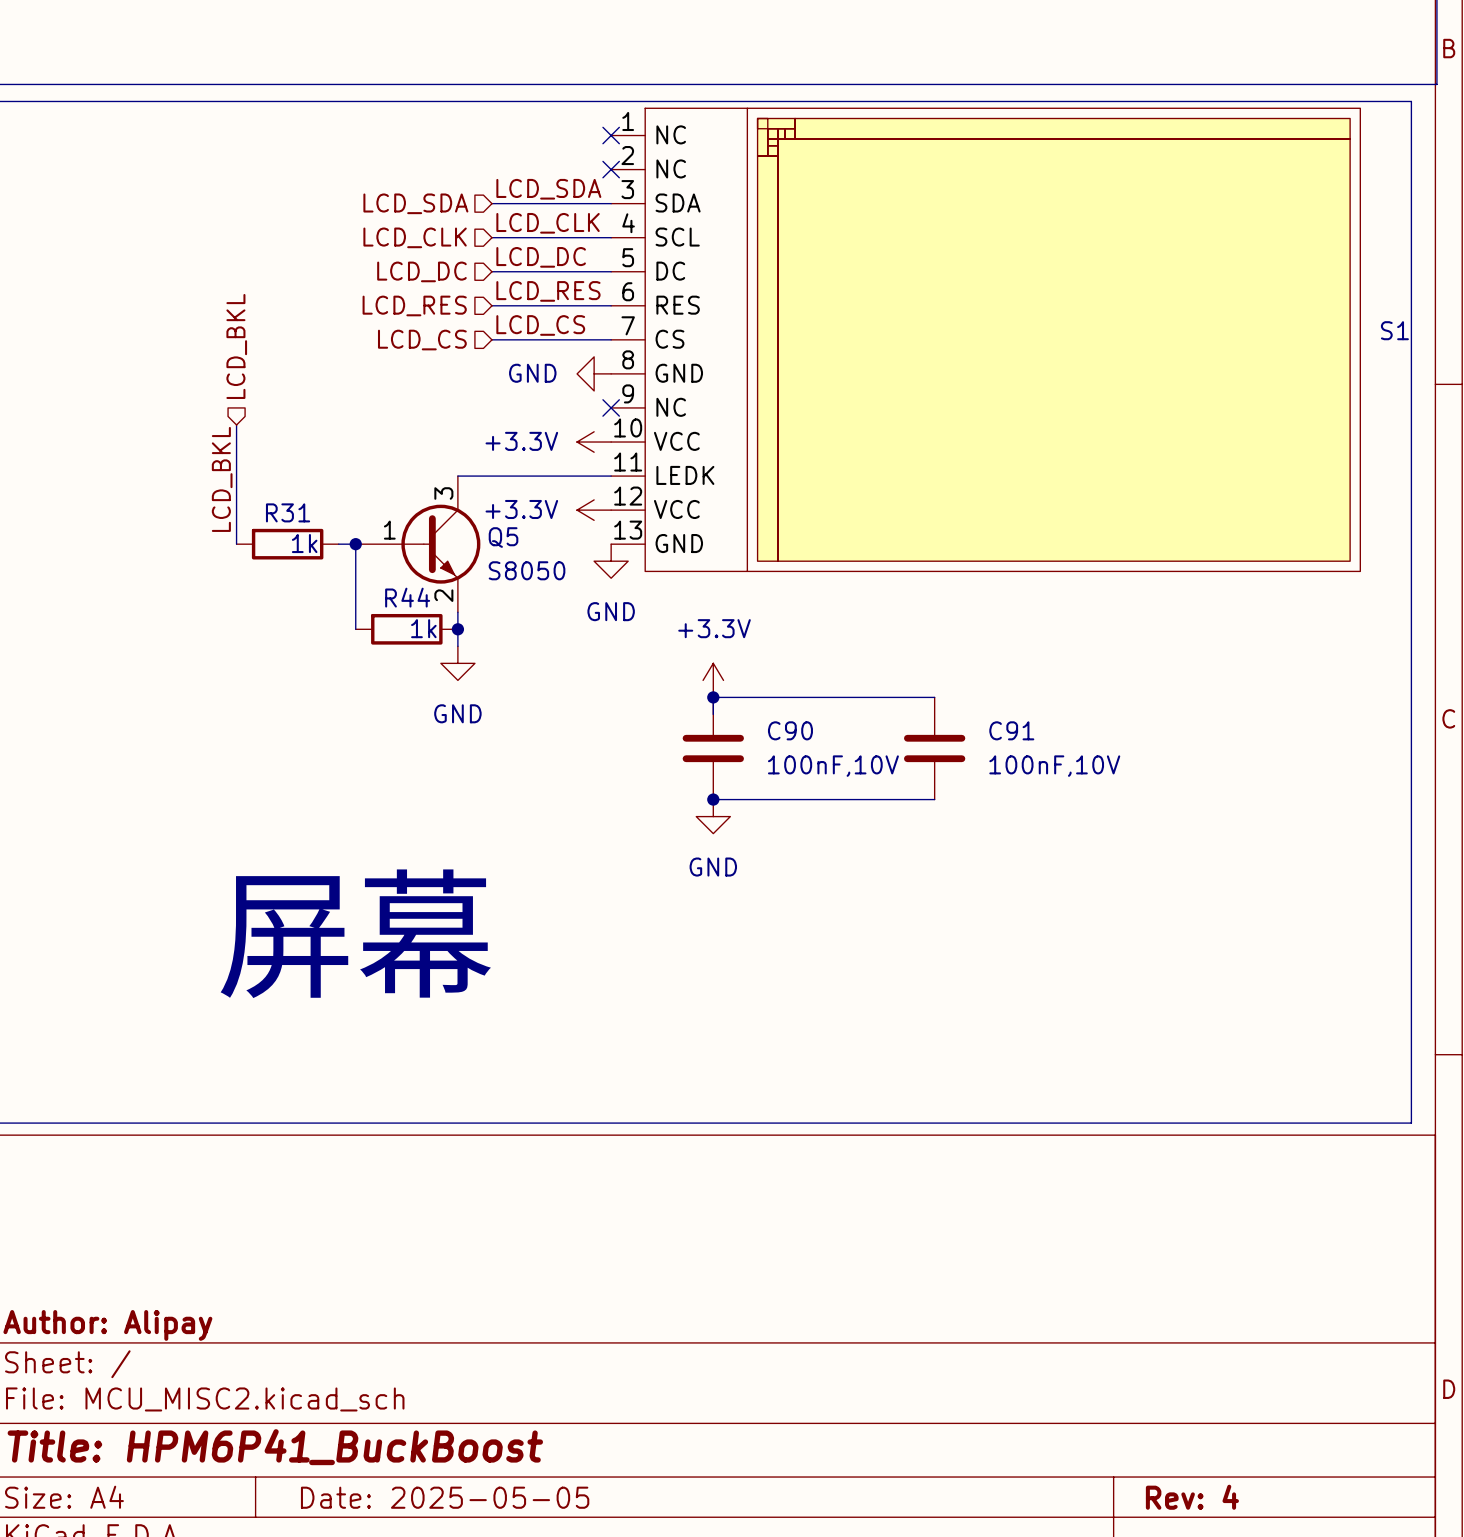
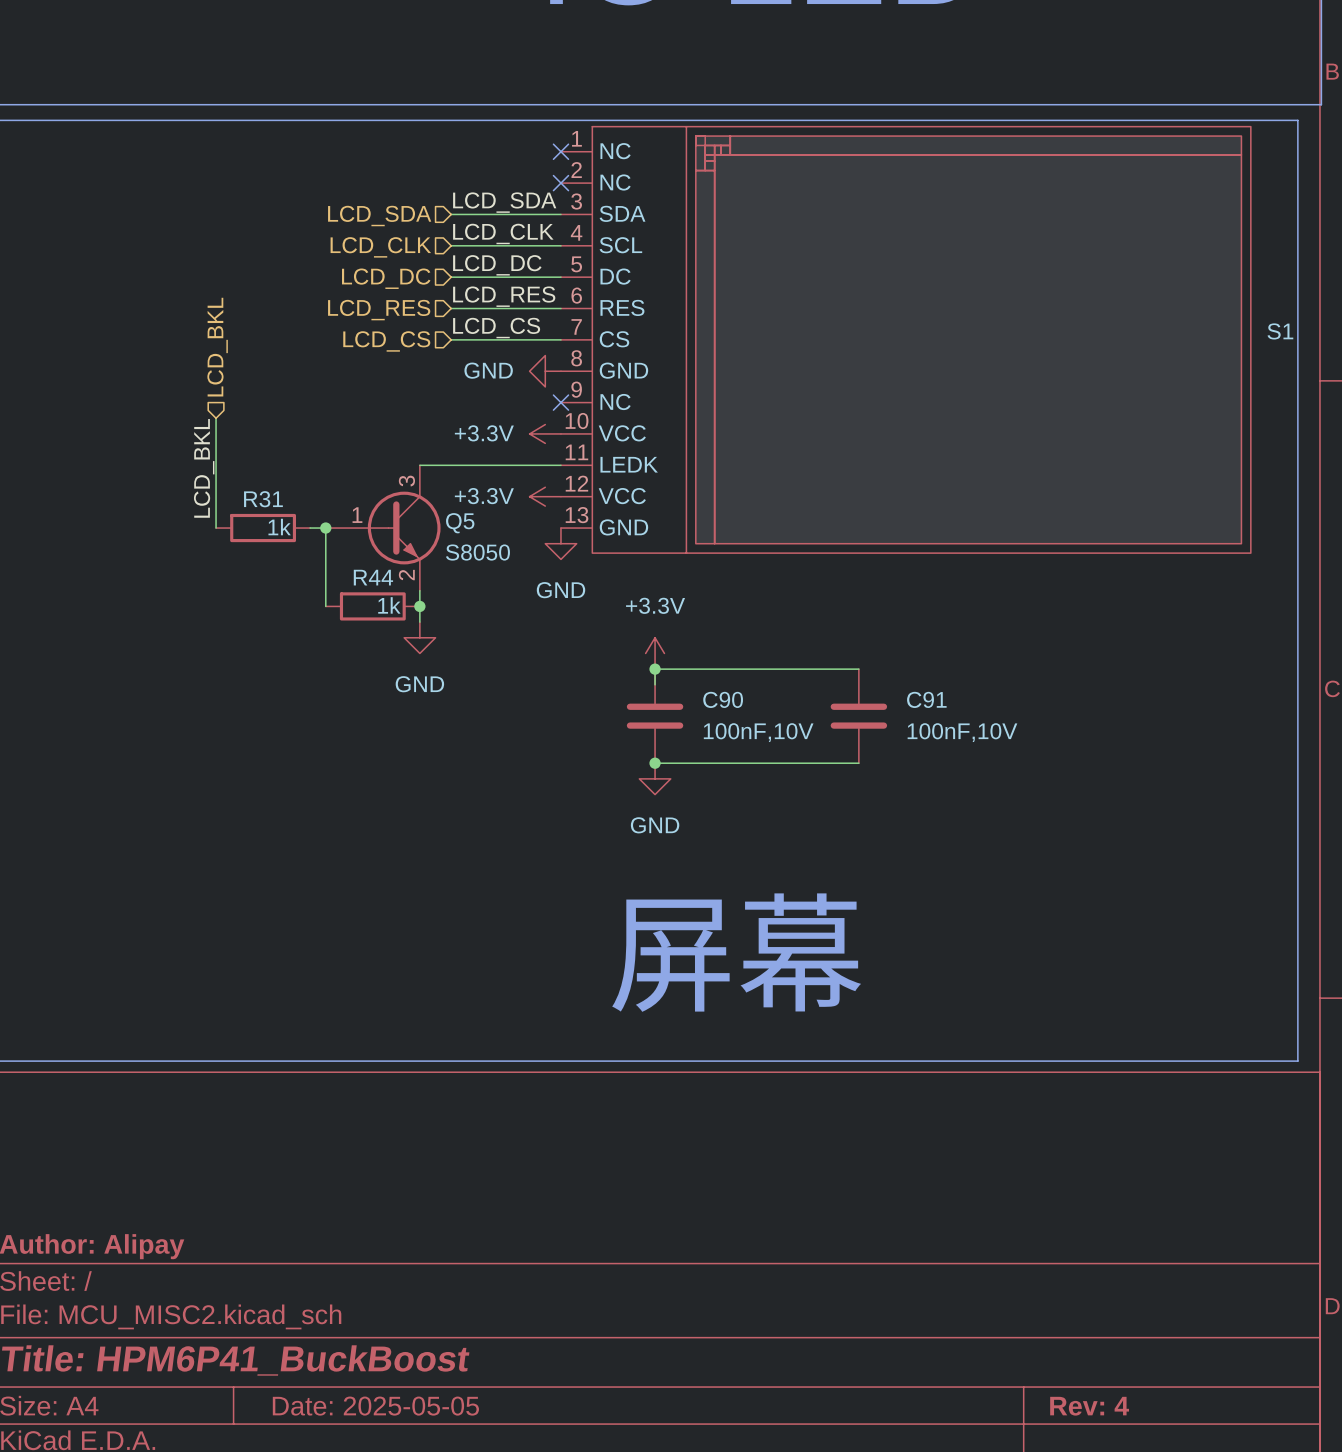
text: 屏幕 (355, 933) -> none
text: none -> 屏幕 (736, 952)

